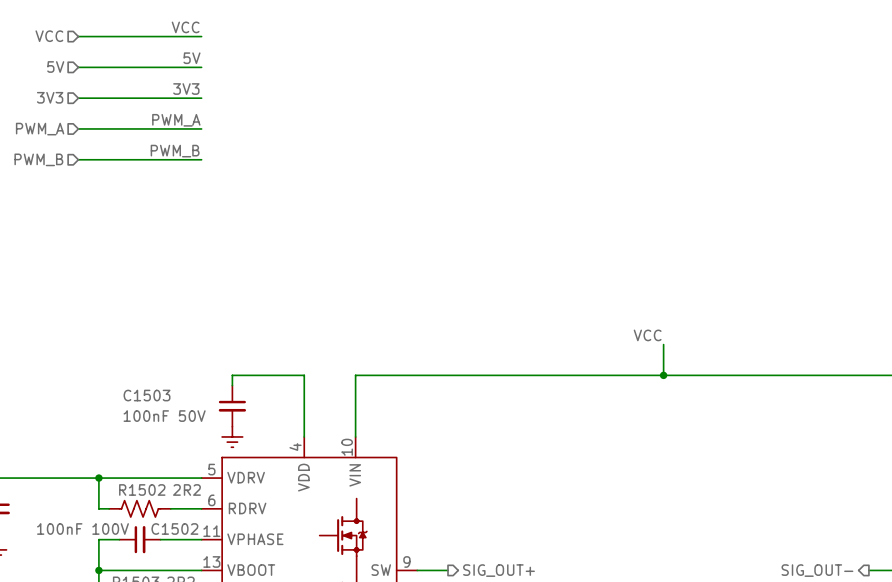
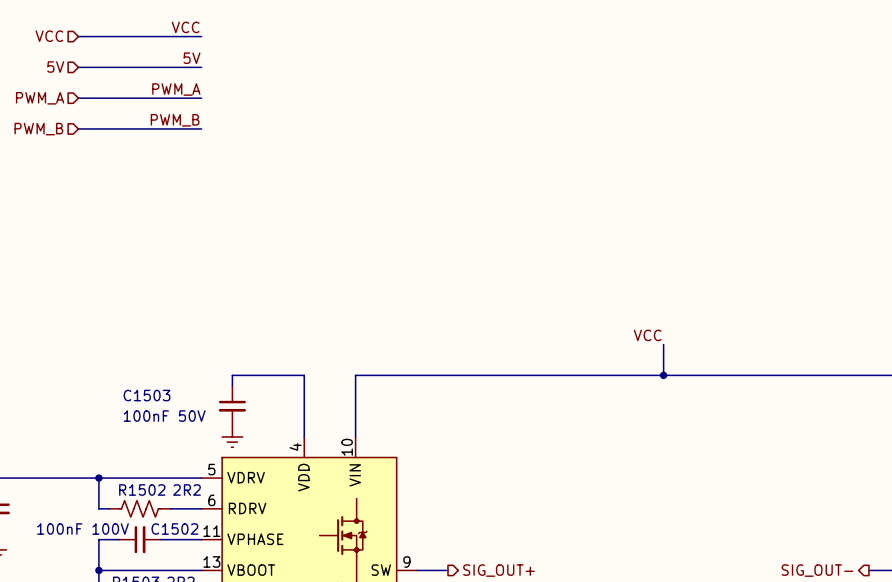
label: 3V3 (186, 89) -> PWM_A (176, 89)
hierarchical label: 3V3 (50, 97) -> PWM_A (40, 98)
label: PWM_A (176, 120) -> PWM_B (175, 120)
hierarchical label: PWM_A (40, 129) -> PWM_B (38, 129)
label: PWM_B (175, 151) -> none
hierarchical label: PWM_B (38, 159) -> none
wire: (78, 159) (201, 159) -> none

